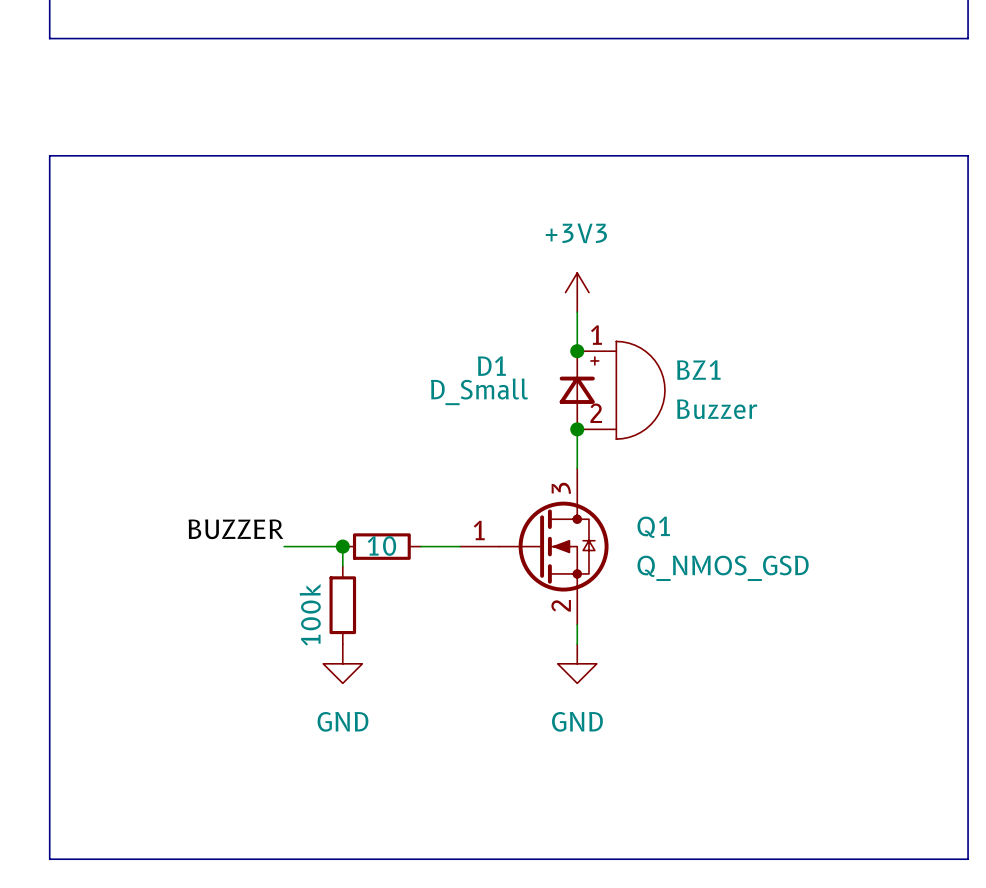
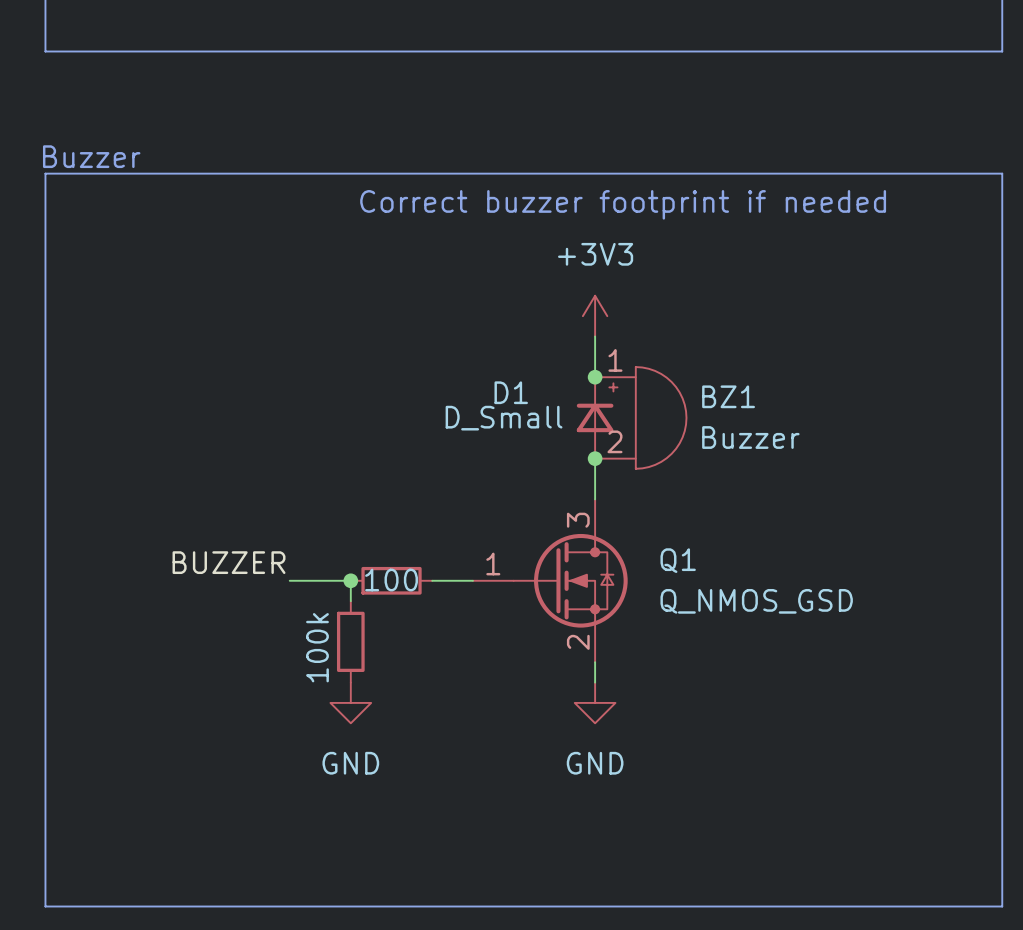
text: none -> Buzzer (91, 156)
text: none -> Correct buzzer footprint if needed (623, 204)
part value: 10 (381, 545) -> 100 (391, 580)

